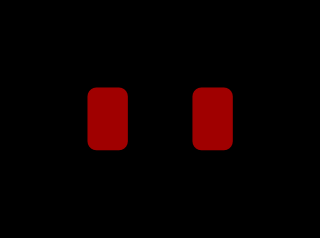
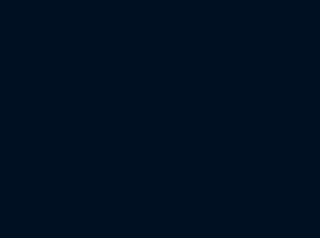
part: (160, 118) -> none

